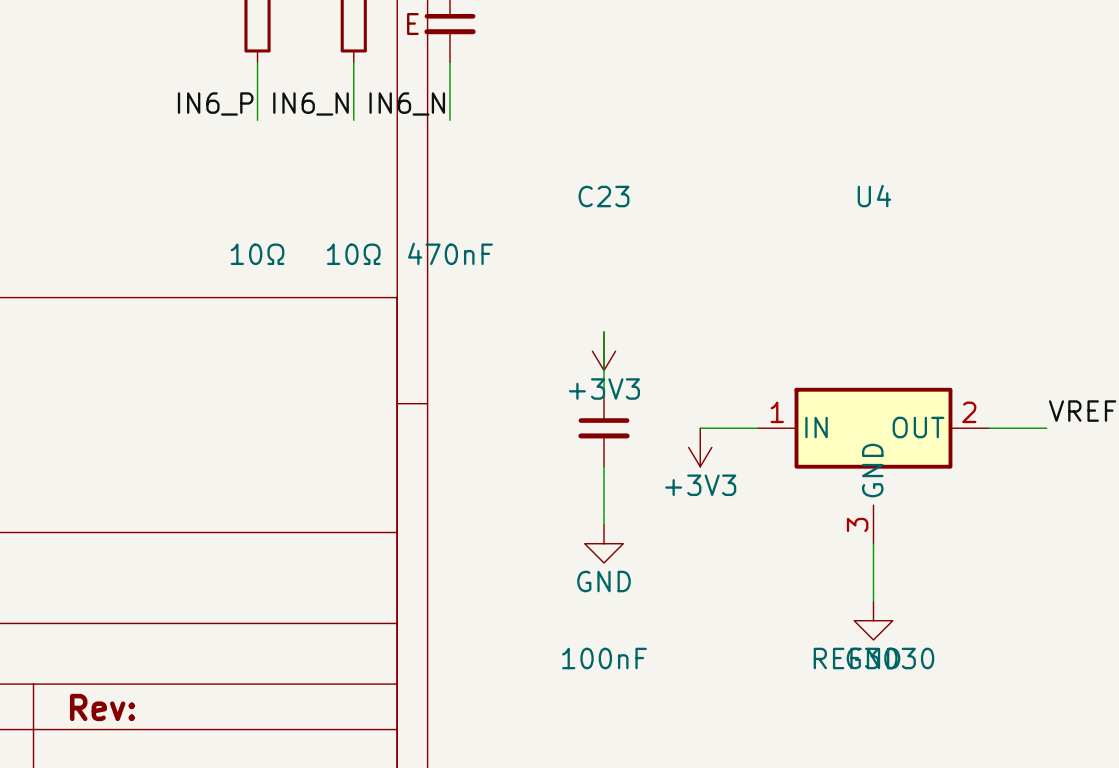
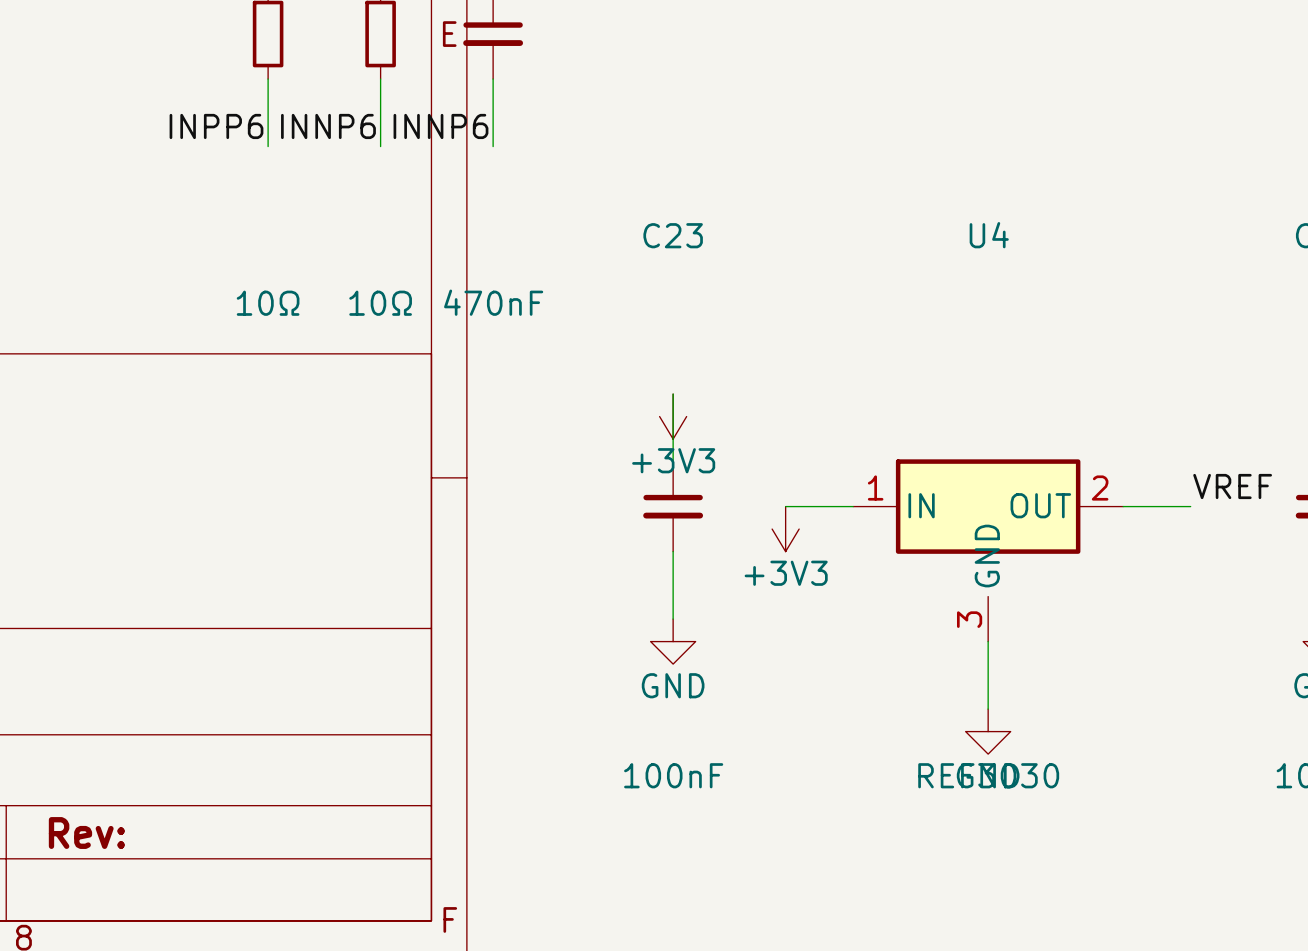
label: IN6_P (215, 103) -> INPP6 (216, 126)
label: IN6_N (311, 103) -> INNP6 (328, 126)
label: IN6_N (407, 103) -> INNP6 (440, 126)

